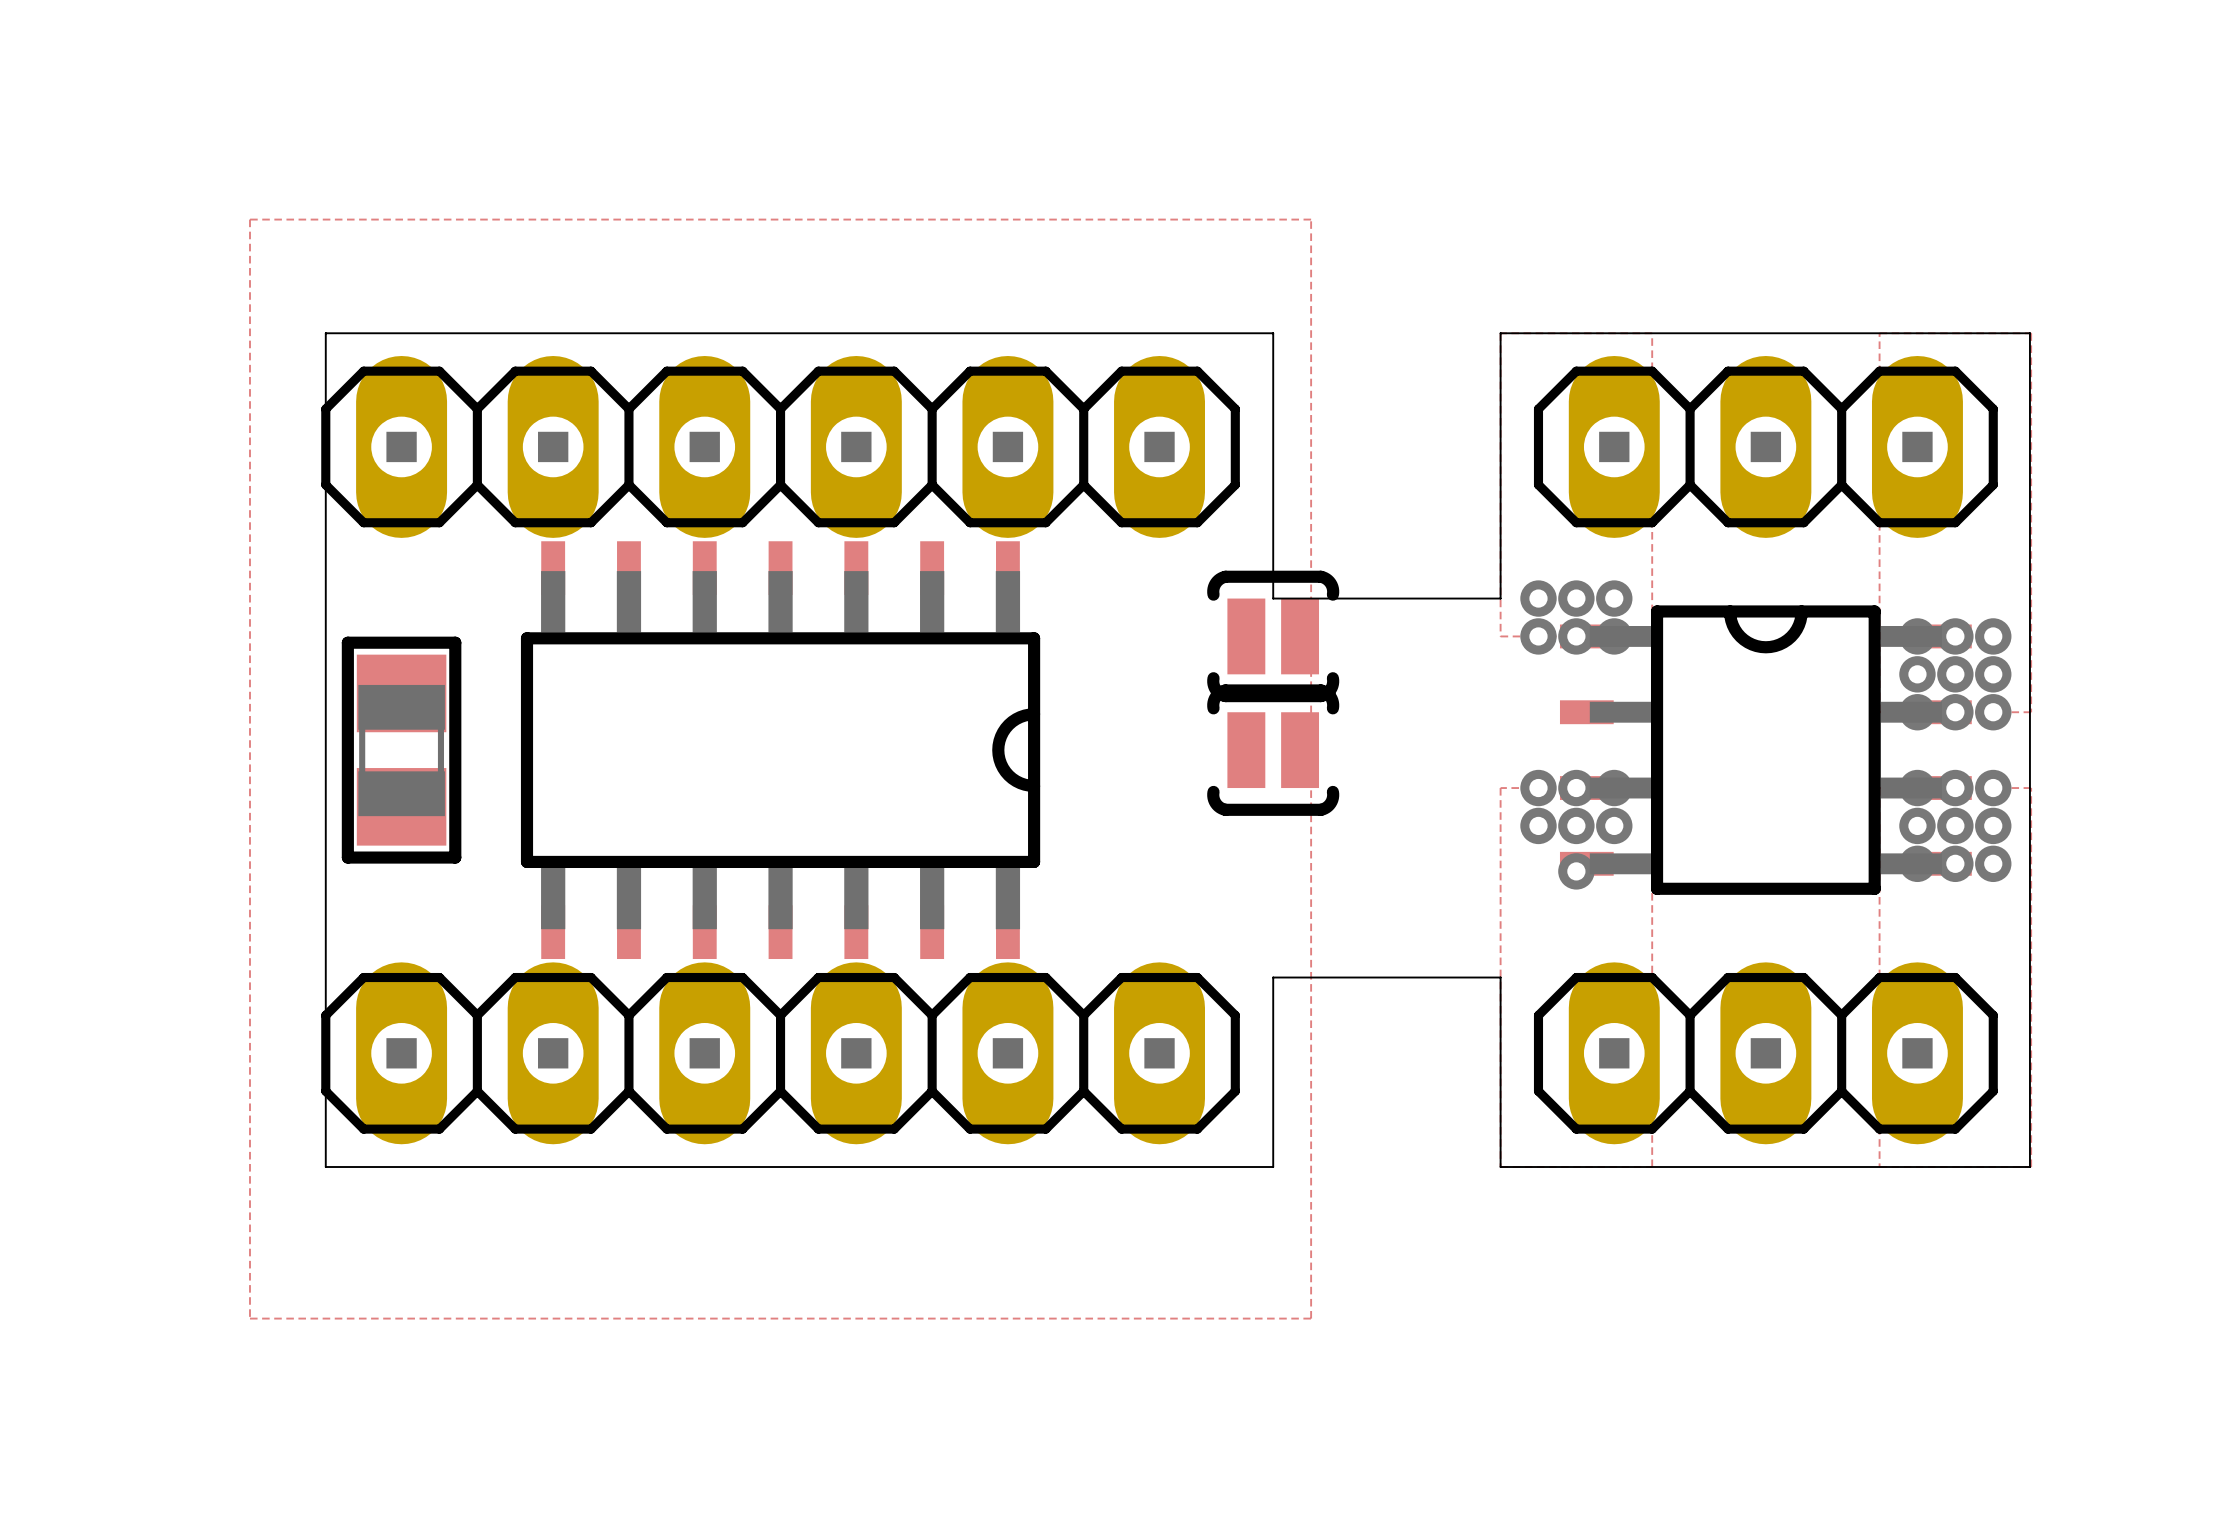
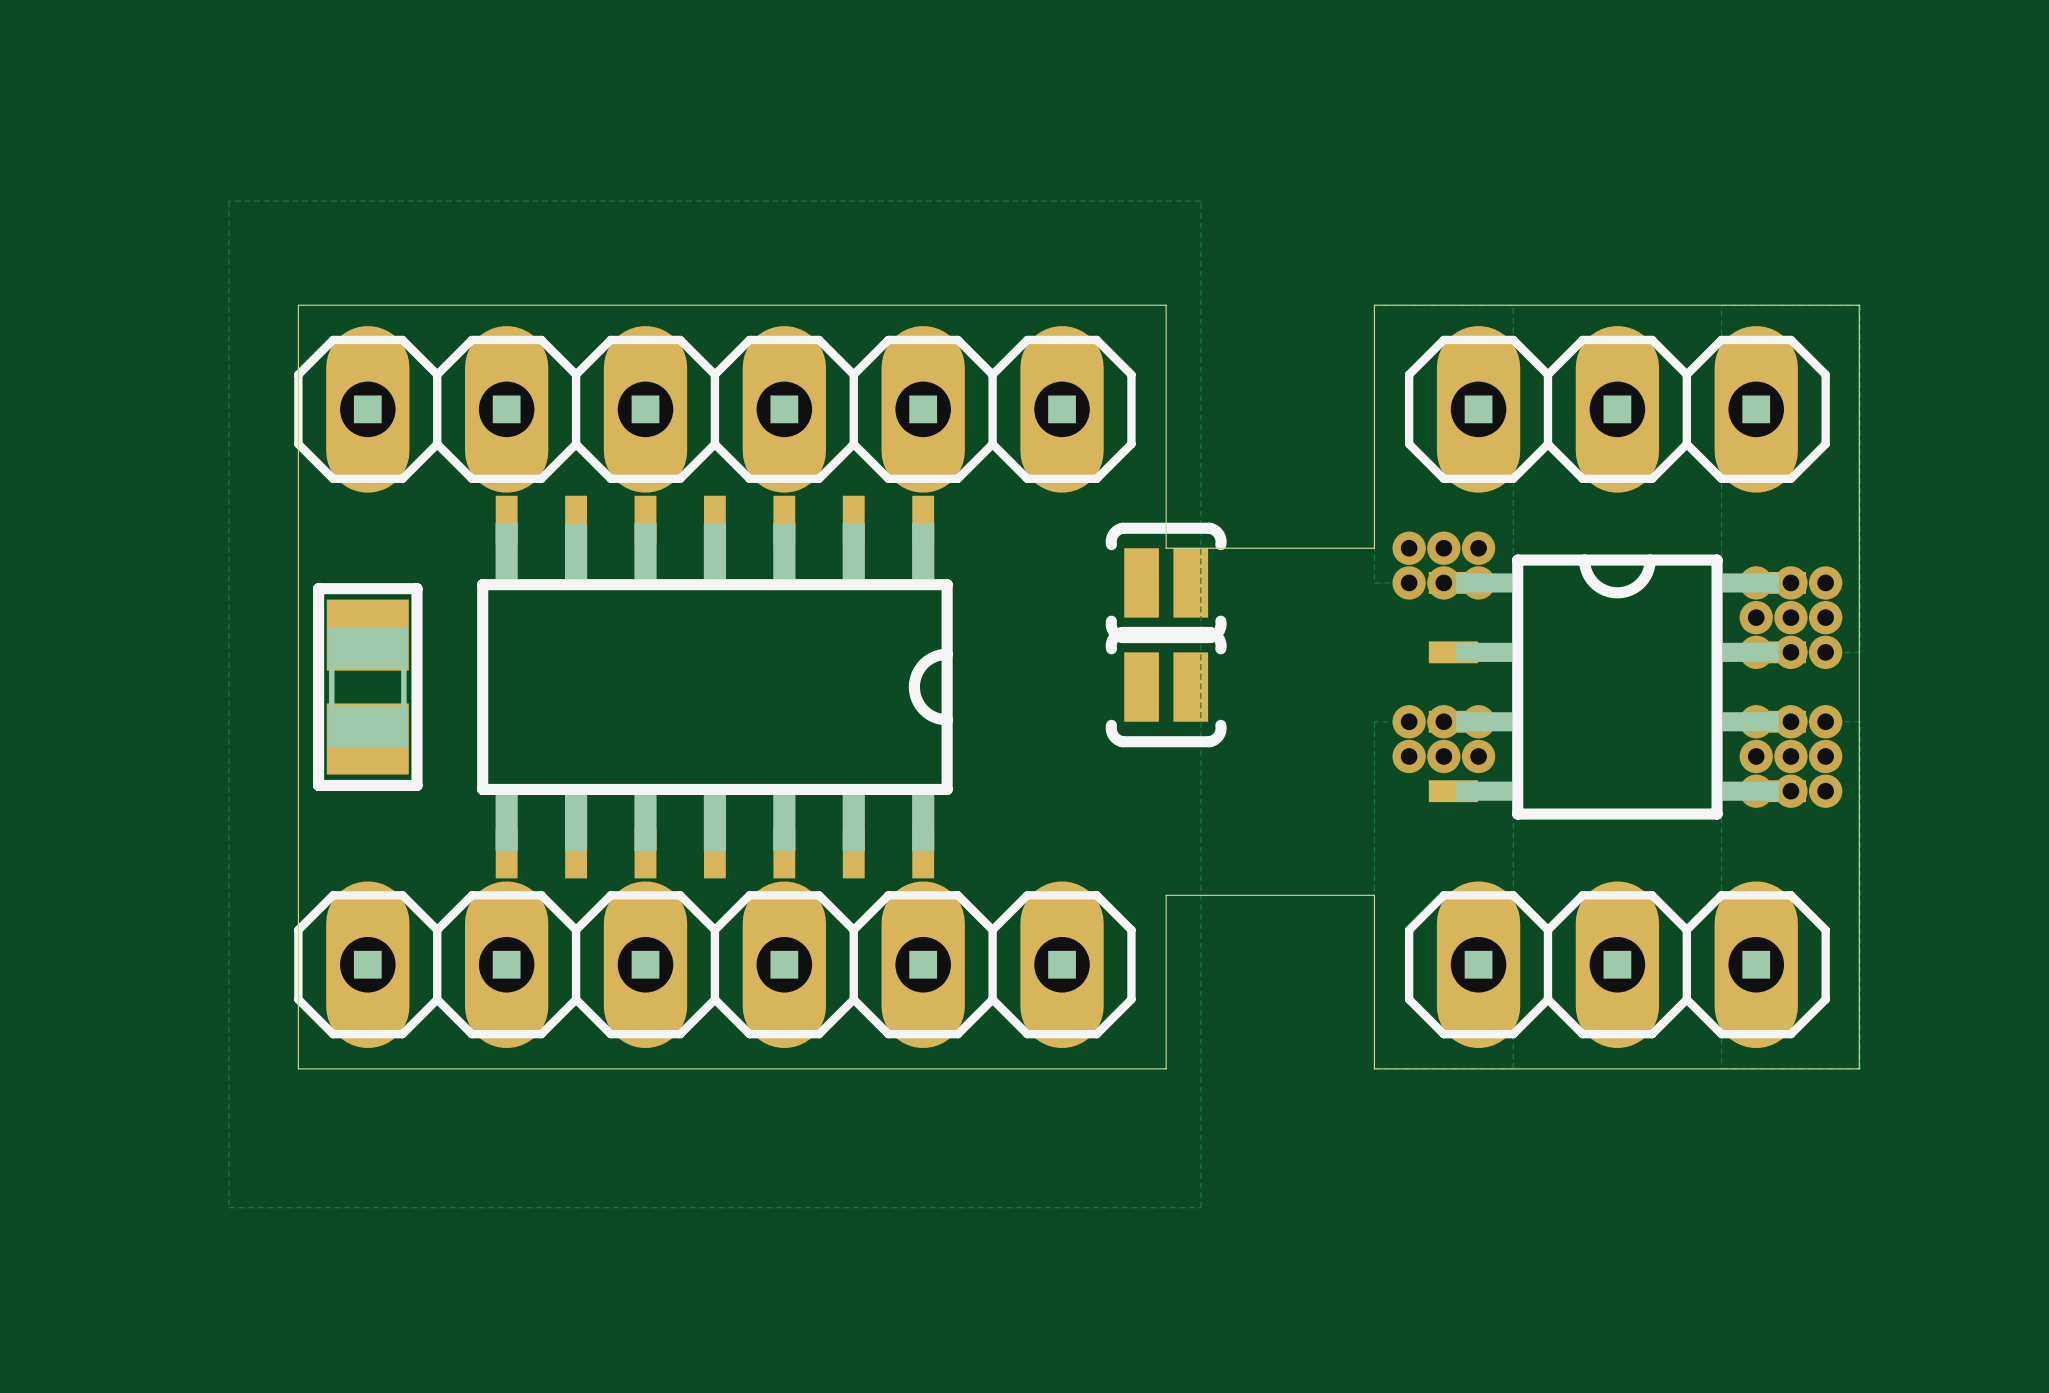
via: (1576, 871) -> none

